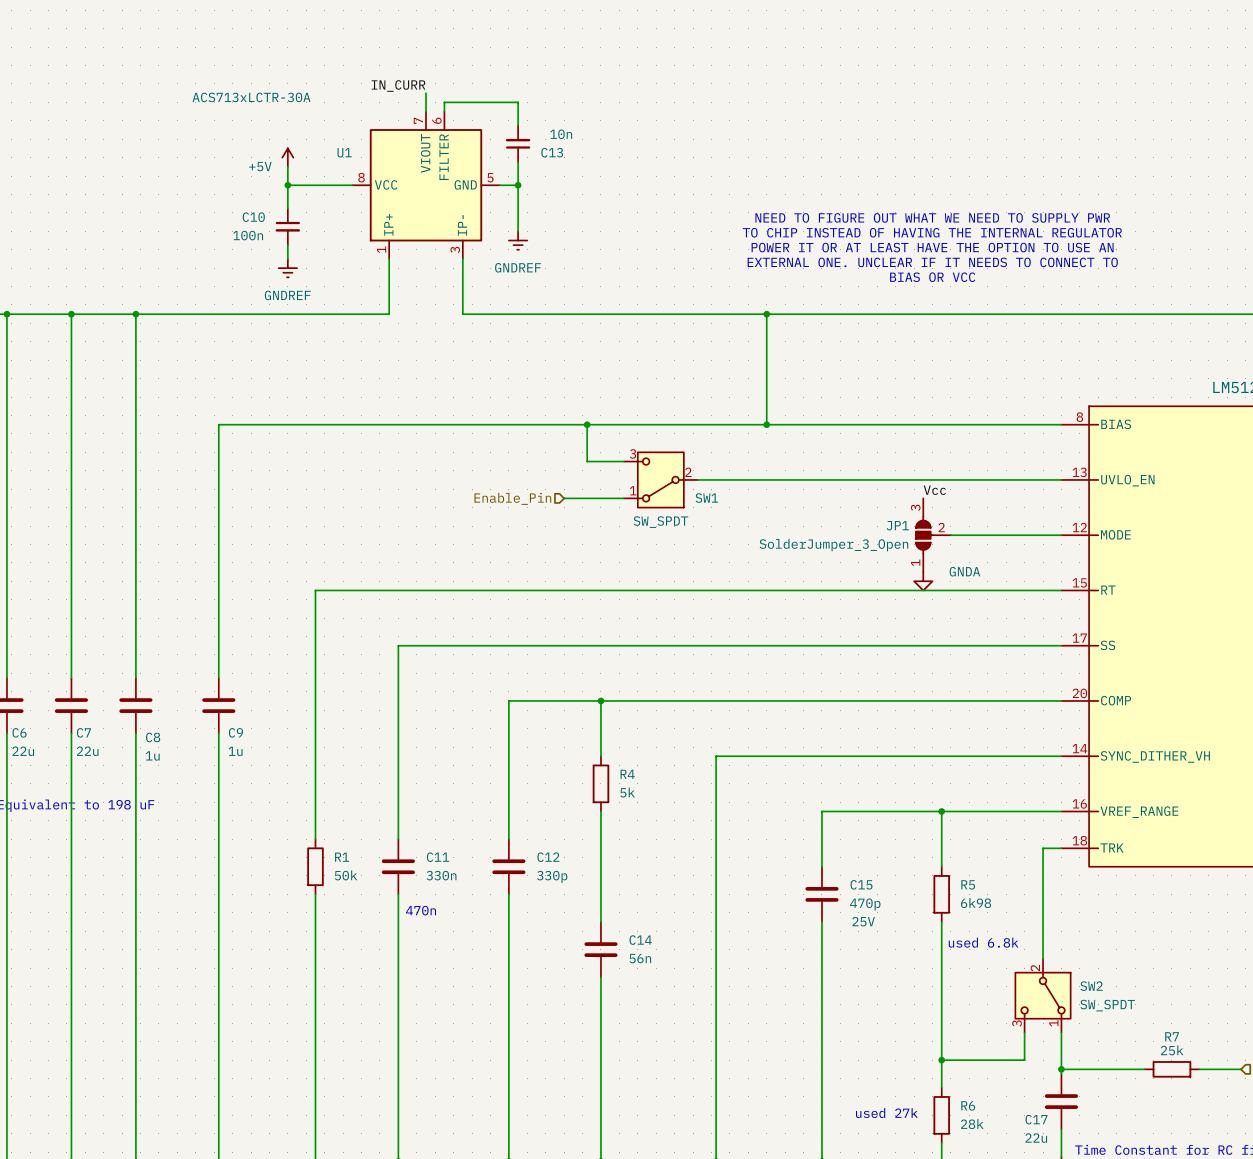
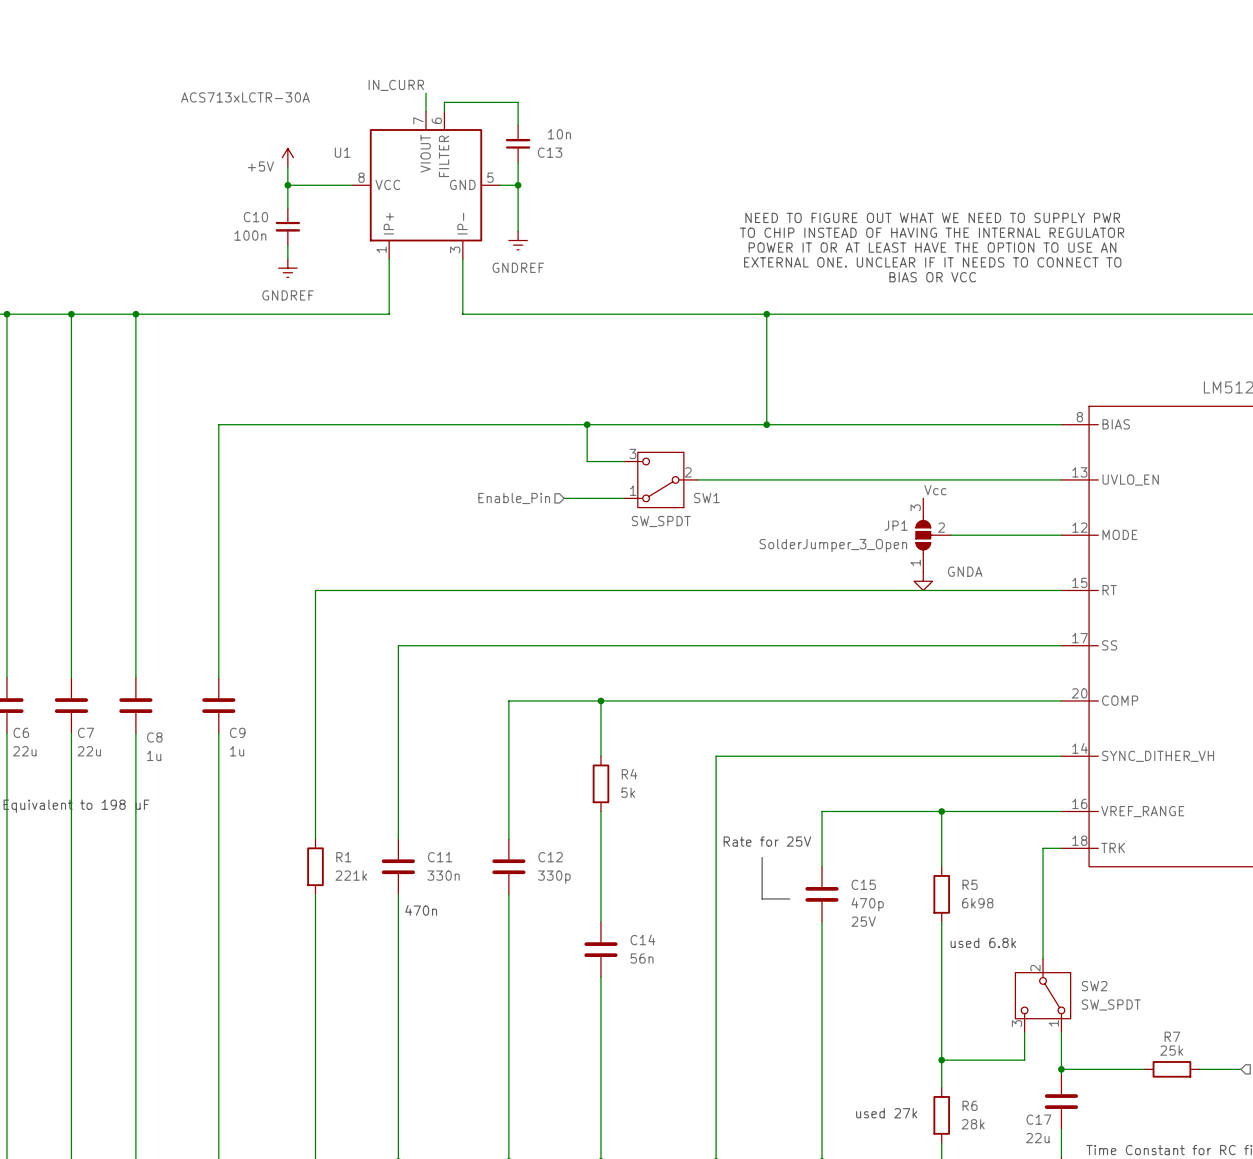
text: none -> Rate for 25V (767, 841)
line: none -> (762, 857) (762, 898) (789, 898)
R1 value: 50k (346, 875) -> 221k (351, 875)

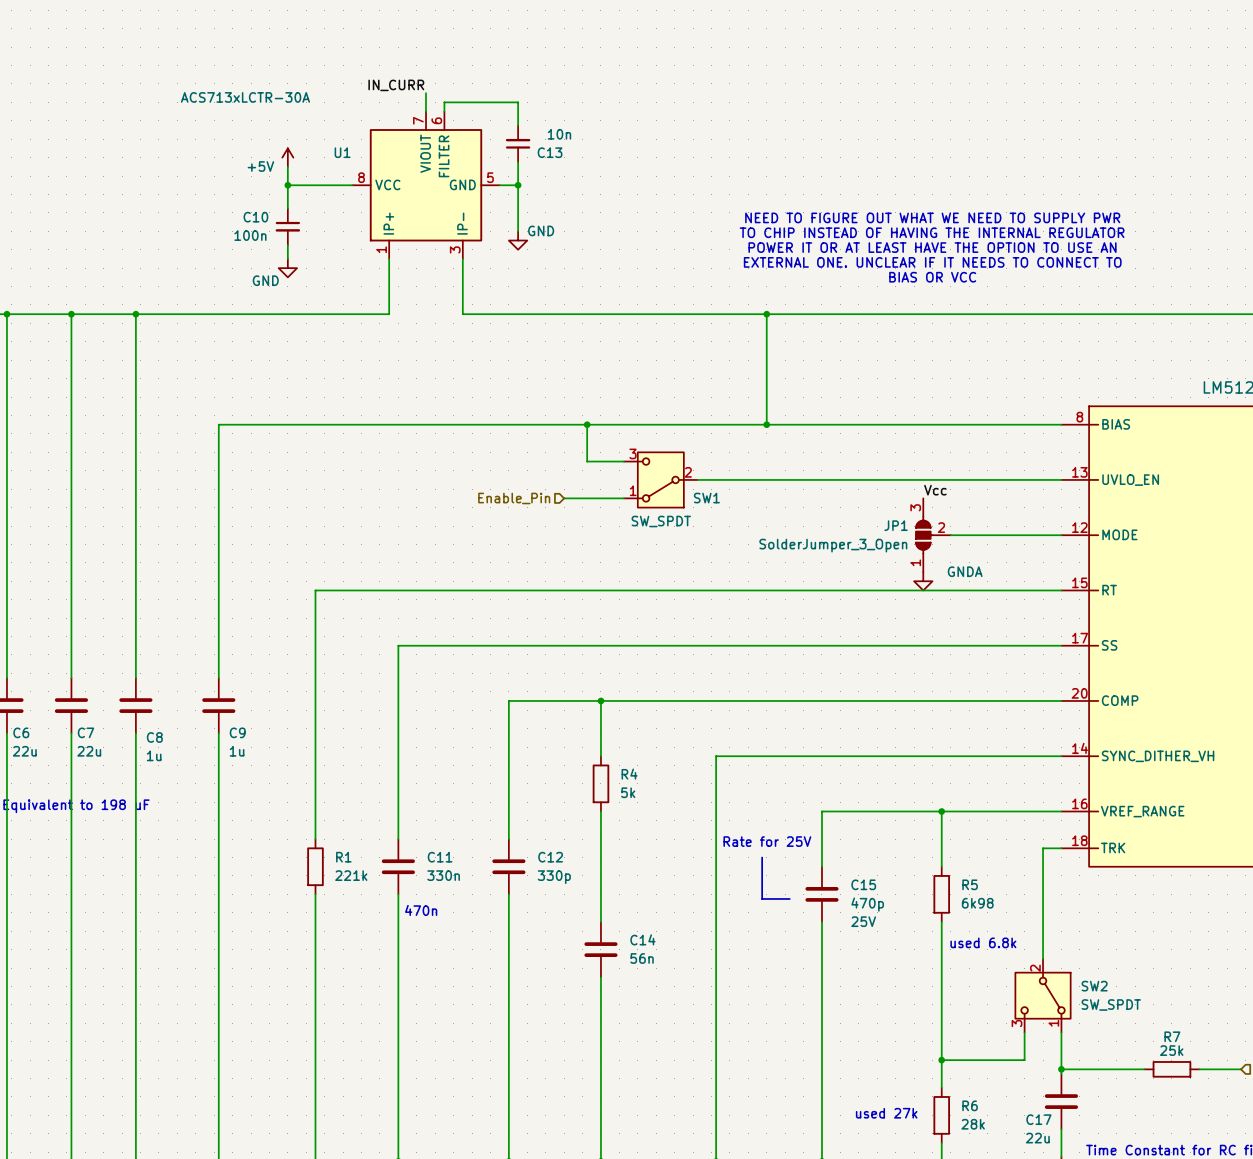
power symbol: GNDREF (518, 240) -> GND (518, 240)
power symbol: GNDREF (287, 268) -> GND (287, 268)

